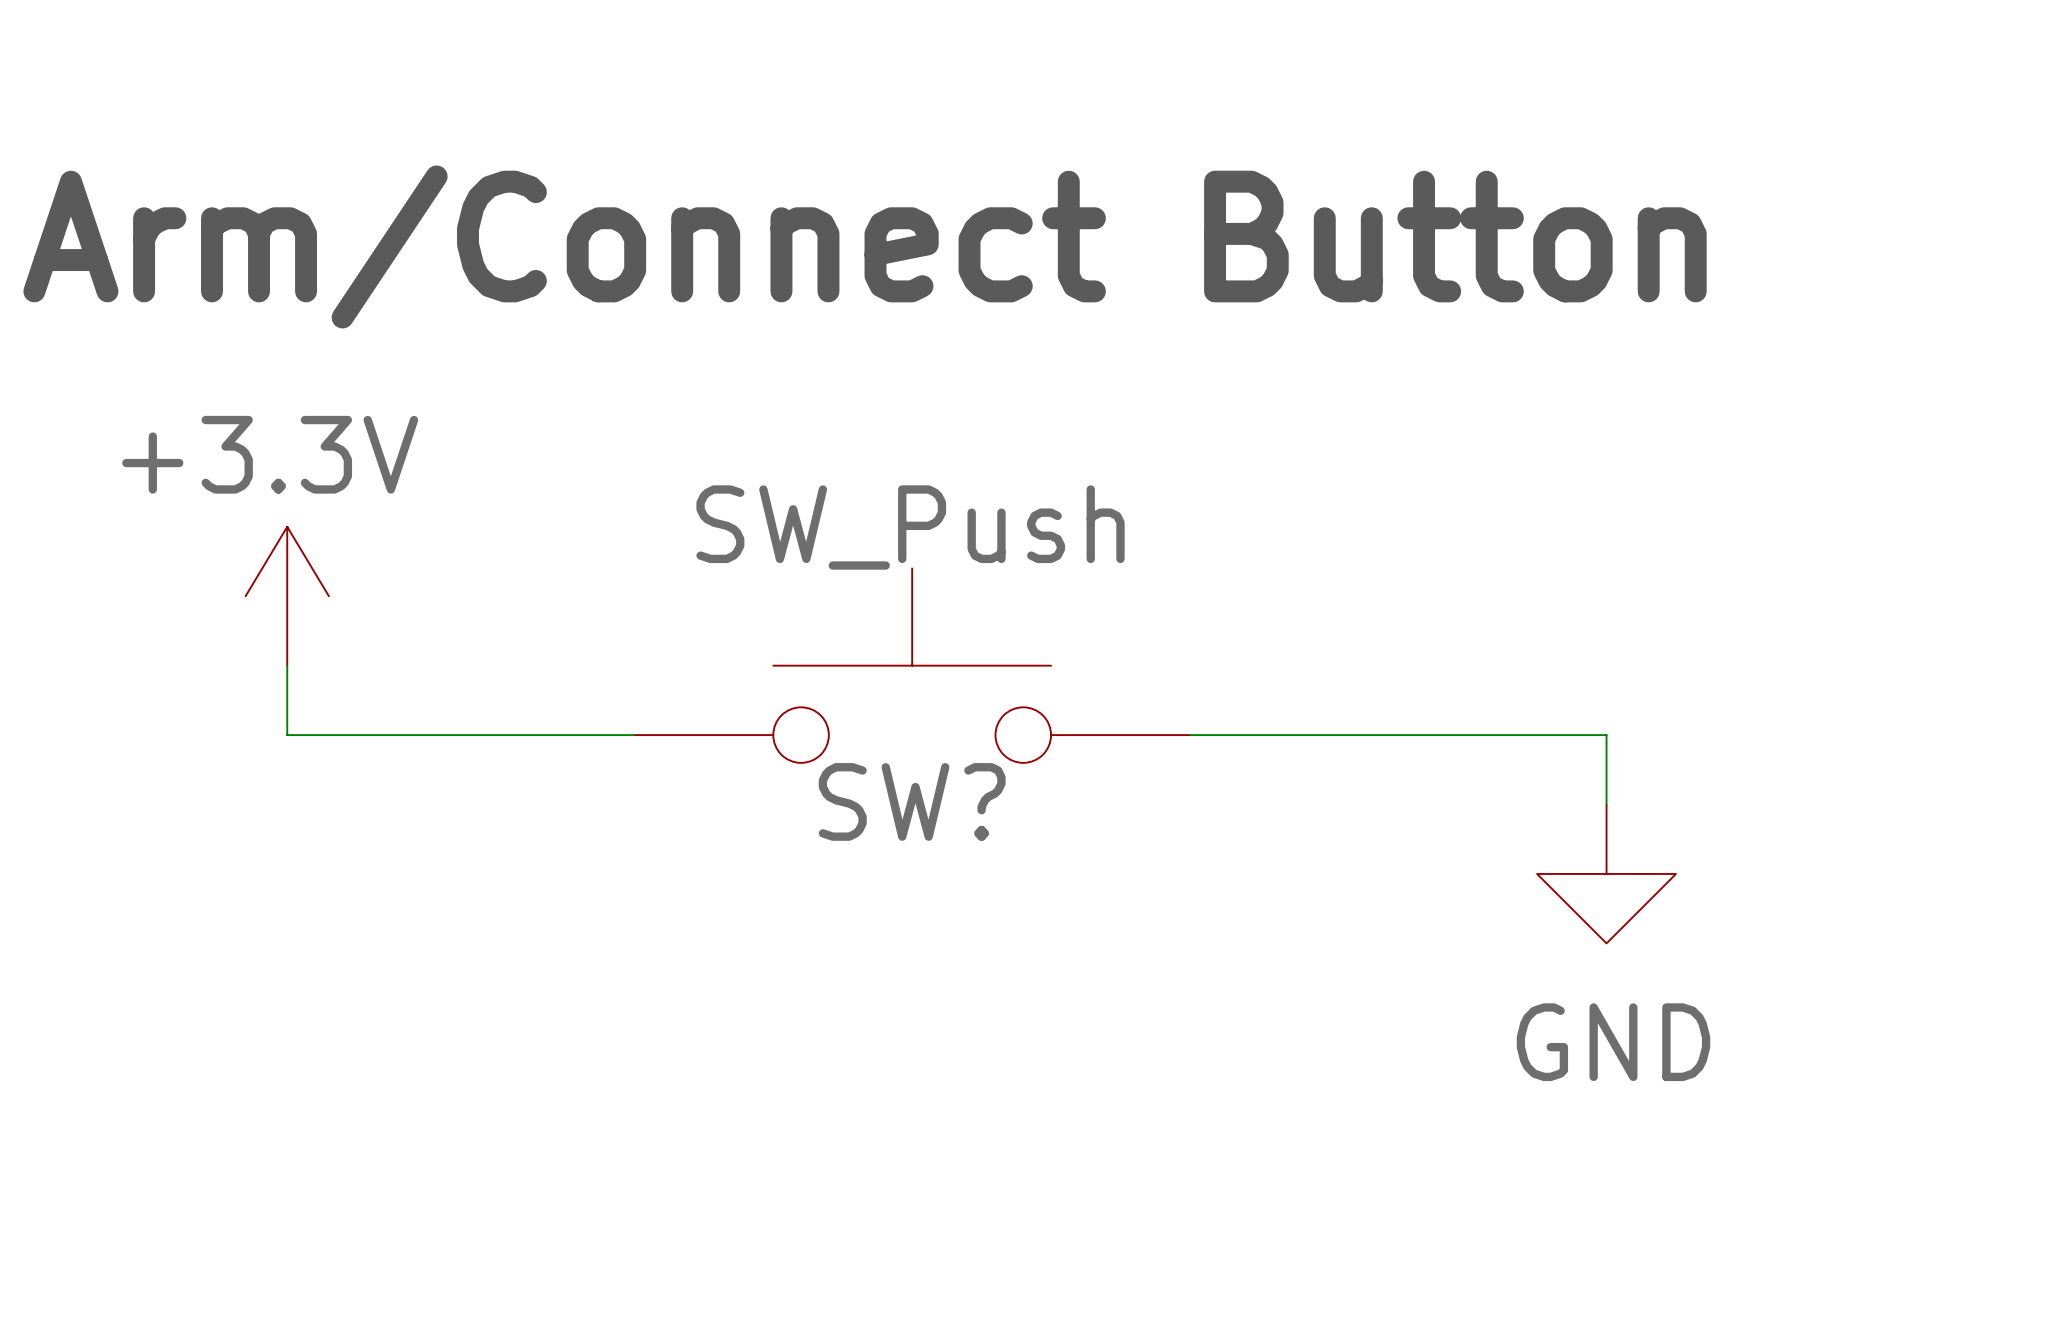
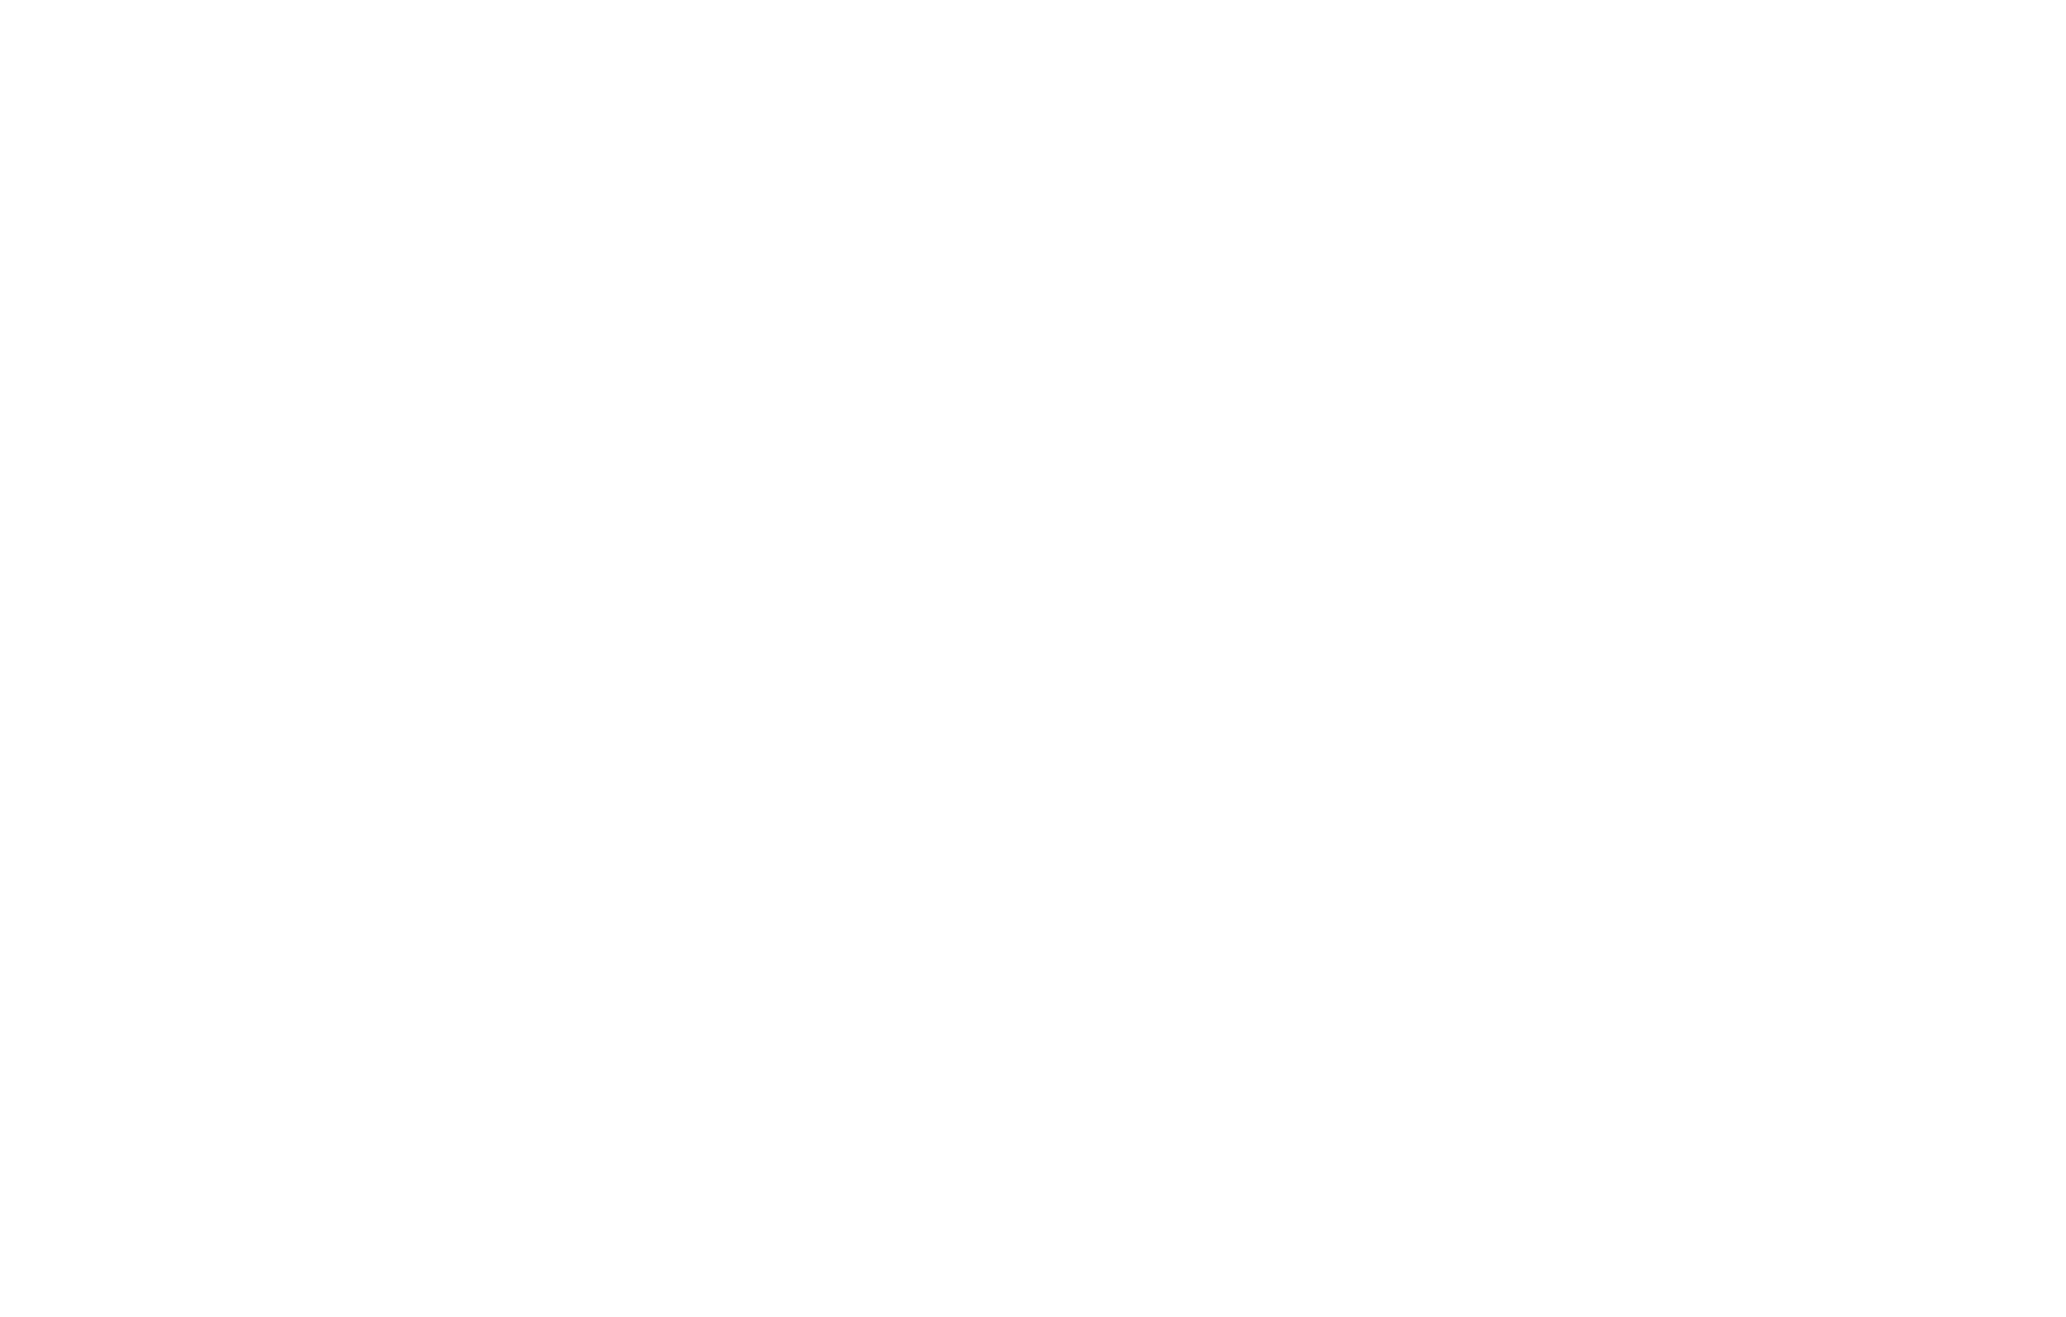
text: Arm/Connect Button (865, 246) -> none
power symbol: +3.3V (287, 596) -> none
wire: (287, 665) (287, 735) (634, 735) -> none
SW?: SW_Push (912, 665) -> none
wire: (1189, 735) (1606, 735) (1606, 804) -> none
power symbol: GND (1606, 873) -> none

